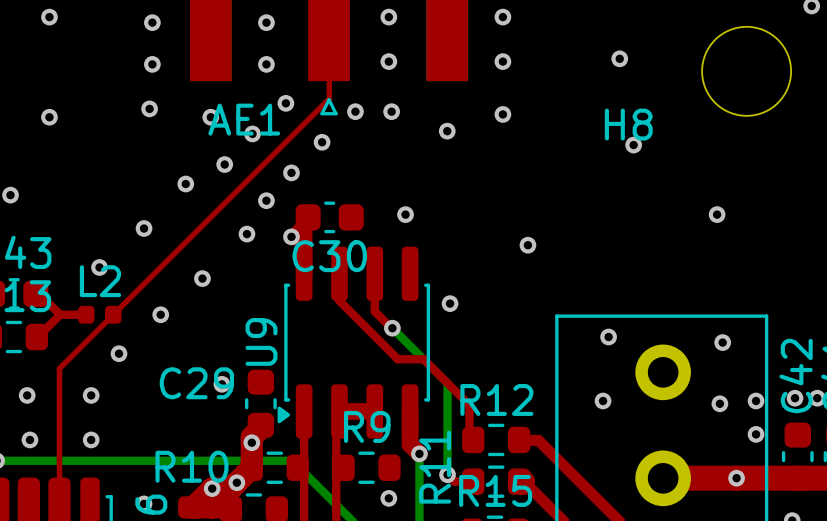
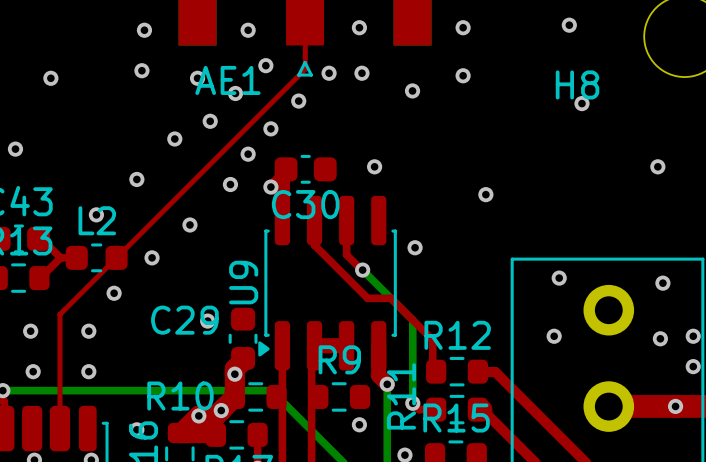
top track: (329, 98) (113, 314) -> (305, 61) (305, 69) (59, 314)
L2 footprint: [78, 305, 122, 324] -> [65, 243, 128, 273]
top track: (110, 317) (59, 368) (59, 377) -> none

